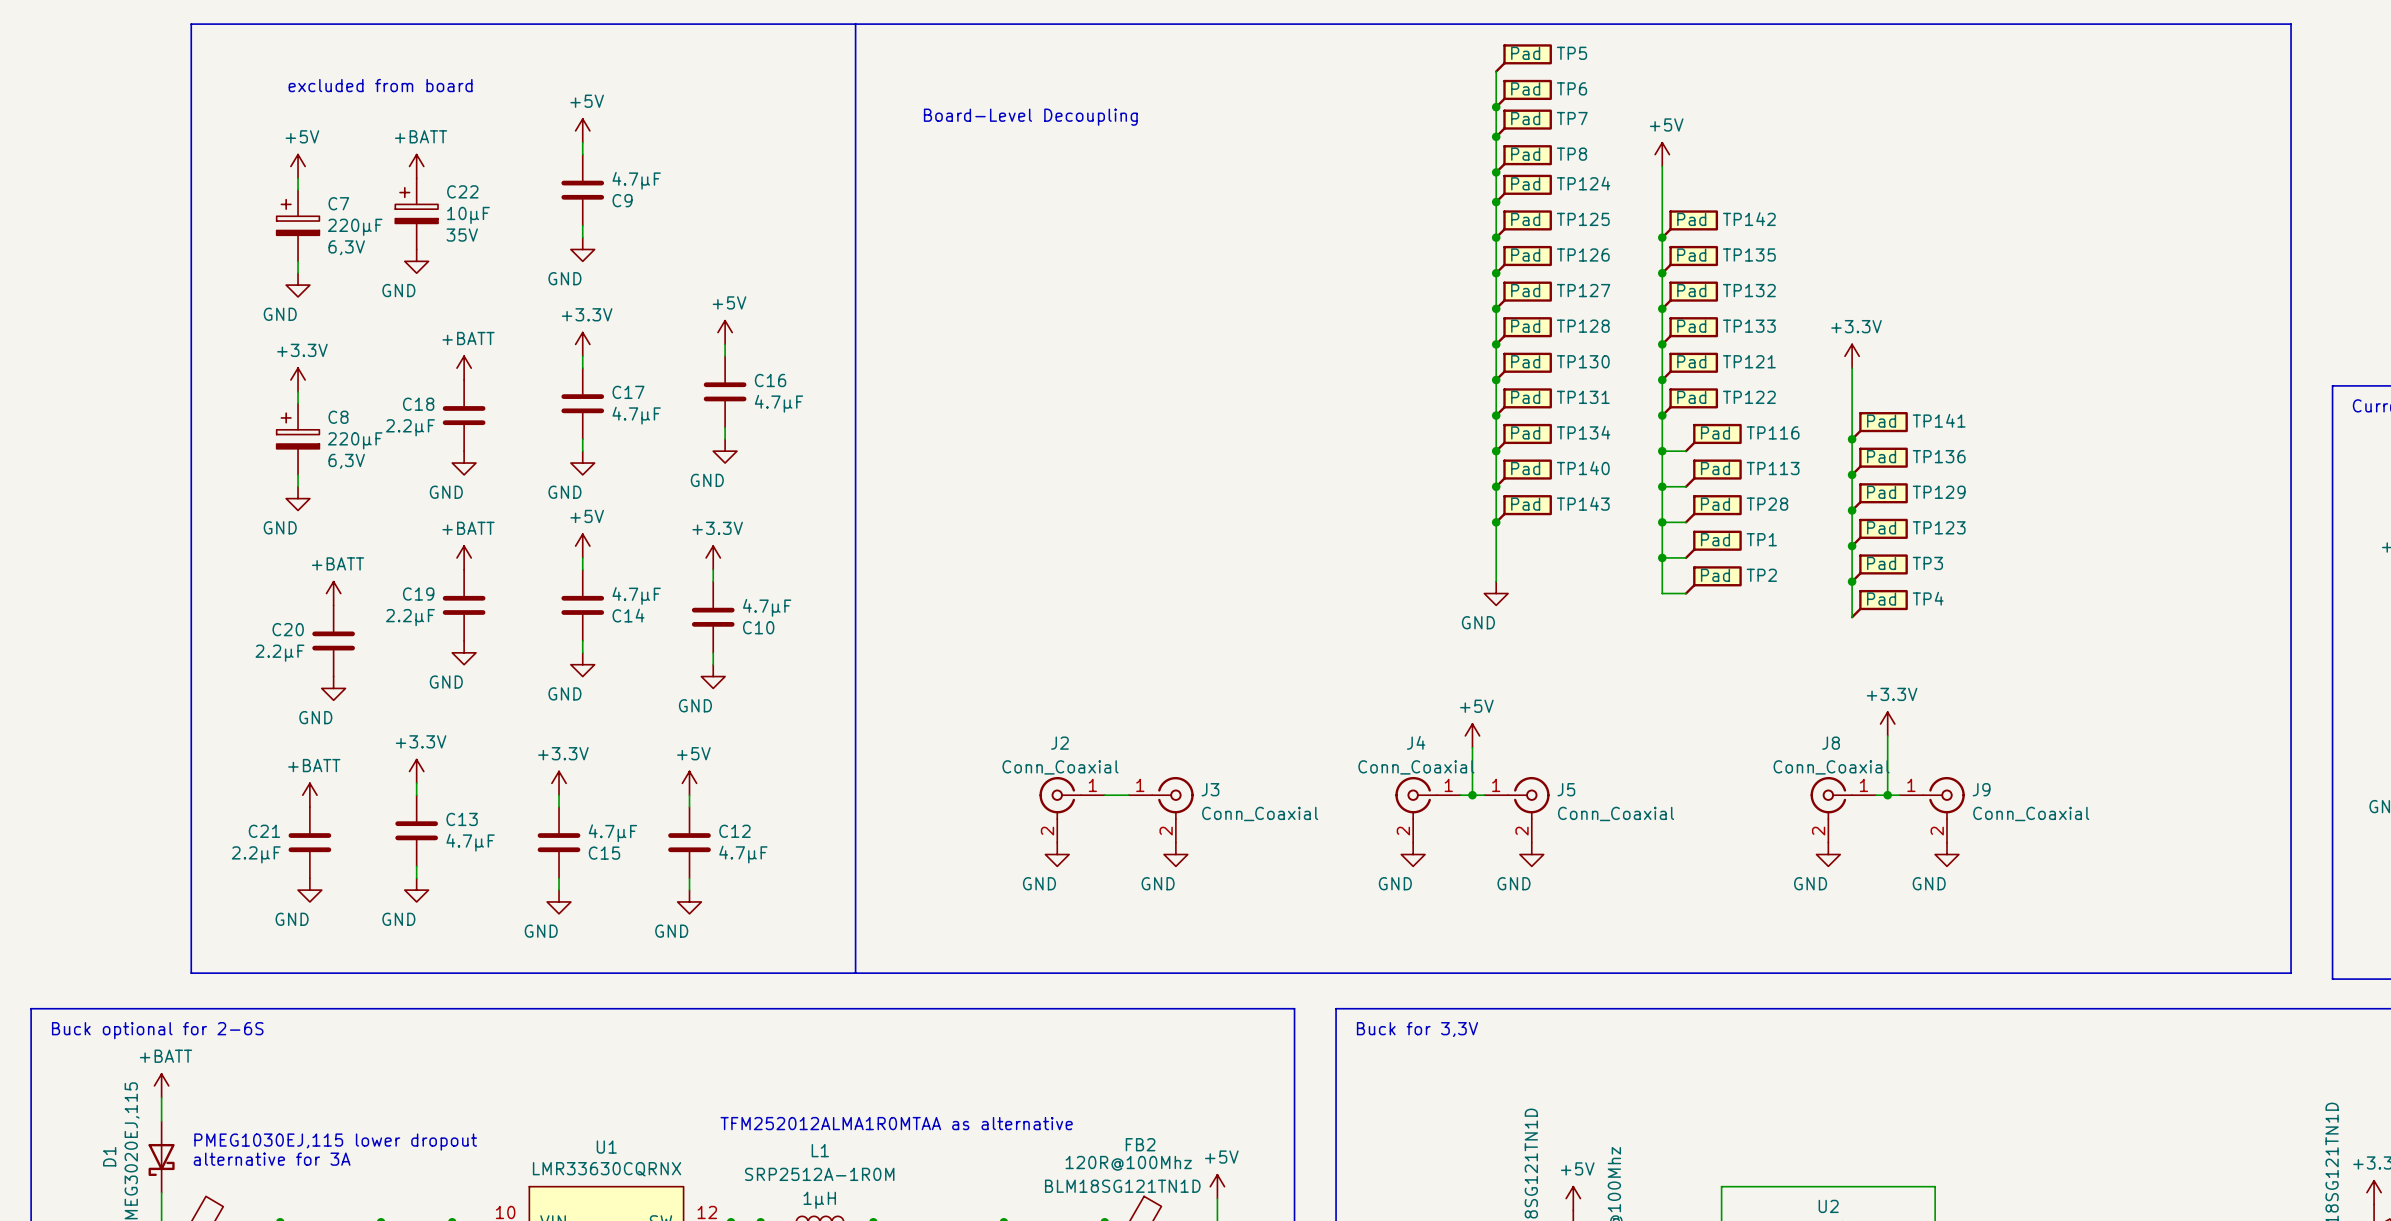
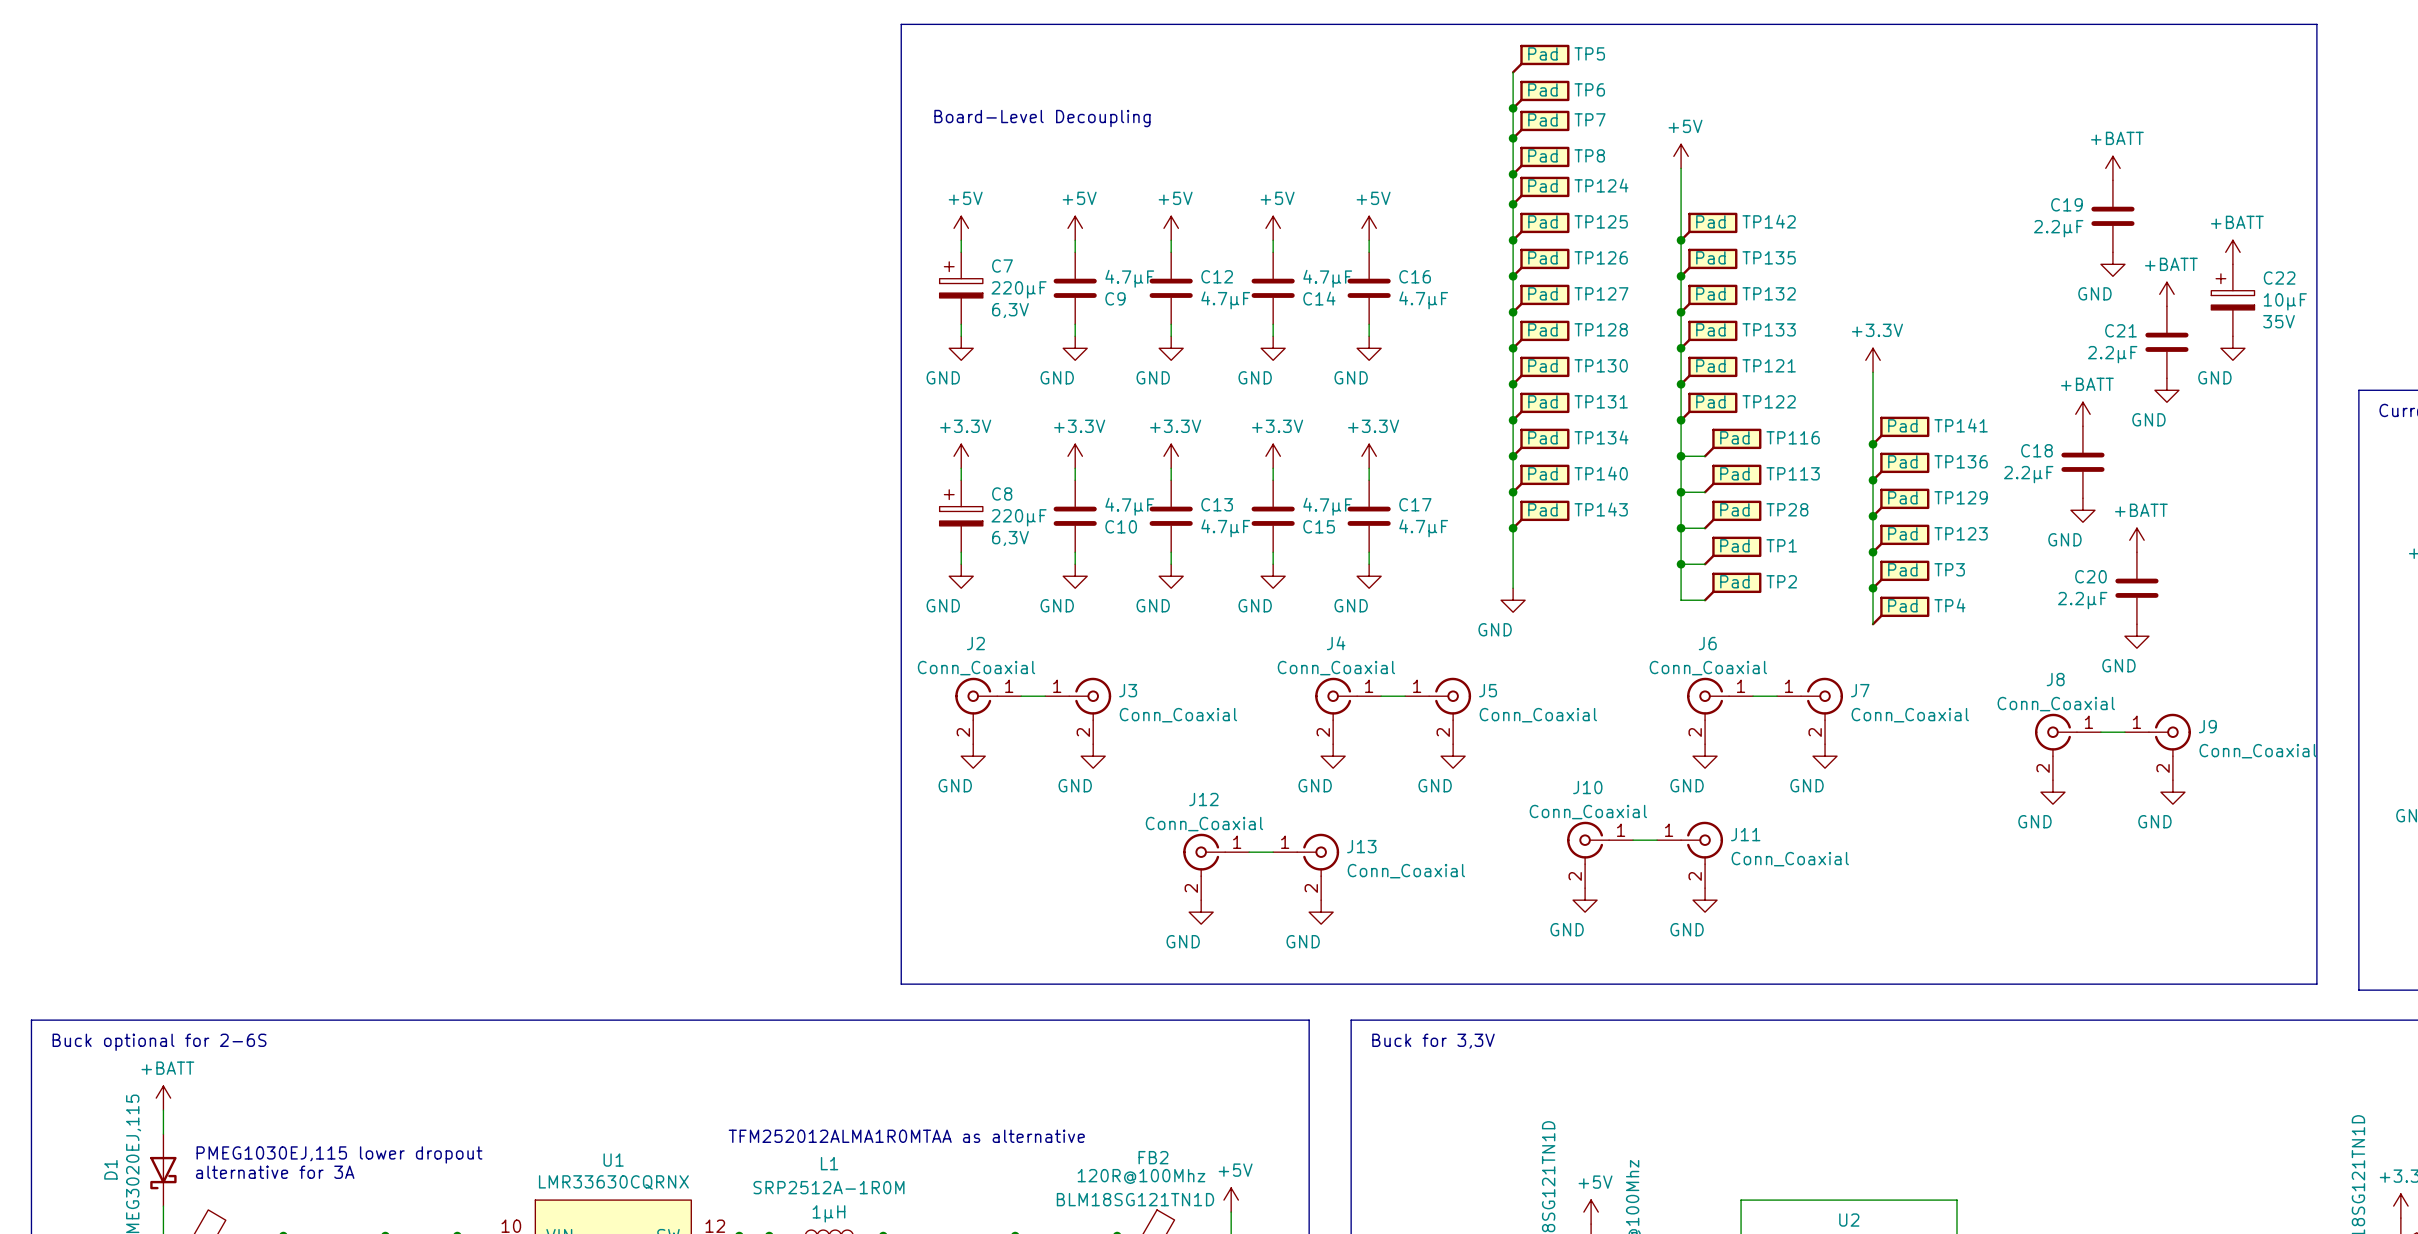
line: (855, 24) (855, 973) -> none
line: (891, 24) (191, 24) (191, 973) (891, 973) -> (901, 24) (901, 984)
text: excluded from board (380, 85) -> none
power symbol: +5V (582, 130) -> none
wire: (582, 142) (582, 154) -> none
power symbol: +5V (298, 166) -> none
power symbol: +BATT (416, 166) -> none
power symbol: none -> +BATT (2112, 168)
wire: (298, 178) (298, 190) -> none
C9 position: (582, 190) -> (1075, 288)
C22 position: (416, 213) -> (2232, 300)
C7 position: (298, 225) -> (961, 288)
wire: (582, 225) (582, 237) -> none
power symbol: none -> +5V (961, 228)
power symbol: none -> +5V (1075, 228)
power symbol: none -> +5V (1171, 228)
power symbol: none -> +5V (1273, 228)
power symbol: none -> +5V (1369, 228)
wire: none -> (961, 240) (961, 252)
wire: none -> (1075, 240) (1075, 252)
wire: none -> (1171, 240) (1171, 252)
wire: none -> (1273, 240) (1273, 252)
wire: none -> (1369, 240) (1369, 252)
power symbol: GND (582, 249) -> none
power symbol: none -> +BATT (2232, 252)
wire: (298, 261) (298, 273) -> none
power symbol: GND (416, 261) -> none
power symbol: none -> GND (2112, 264)
power symbol: GND (298, 285) -> none
power symbol: none -> +BATT (2166, 294)
wire: none -> (1075, 324) (1075, 336)
wire: none -> (1171, 324) (1171, 336)
wire: none -> (1273, 324) (1273, 336)
wire: none -> (1369, 324) (1369, 336)
power symbol: +5V (725, 332) -> none
power symbol: +3.3V (582, 344) -> none
wire: (725, 344) (725, 356) -> (961, 324) (961, 336)
power symbol: none -> GND (961, 348)
power symbol: none -> GND (1075, 348)
power symbol: none -> GND (1171, 348)
power symbol: none -> GND (1273, 348)
power symbol: none -> GND (1369, 348)
power symbol: none -> GND (2232, 348)
wire: (582, 356) (582, 368) -> none
power symbol: +BATT (464, 368) -> none
power symbol: +3.3V (298, 379) -> none
power symbol: none -> GND (2166, 390)
wire: (298, 391) (298, 403) -> none
C16 position: (725, 391) -> (1369, 288)
C17 position: (582, 403) -> (1369, 516)
power symbol: none -> +BATT (2082, 414)
C18 position: (464, 415) -> (2082, 462)
wire: (725, 427) (725, 439) -> (961, 468) (961, 480)
C8 position: (298, 439) -> (961, 516)
wire: (582, 439) (582, 451) -> none
power symbol: GND (725, 451) -> none
power symbol: none -> +3.3V (961, 456)
power symbol: none -> +3.3V (1075, 456)
power symbol: none -> +3.3V (1171, 456)
power symbol: none -> +3.3V (1273, 456)
power symbol: none -> +3.3V (1369, 456)
power symbol: GND (464, 463) -> none
power symbol: GND (582, 463) -> none
wire: none -> (1075, 468) (1075, 480)
wire: none -> (1171, 468) (1171, 480)
wire: none -> (1273, 468) (1273, 480)
wire: none -> (1369, 468) (1369, 480)
wire: (298, 474) (298, 486) -> none
power symbol: GND (298, 498) -> none
power symbol: none -> GND (2082, 510)
power symbol: none -> +BATT (2136, 540)
power symbol: +5V (582, 546) -> none
wire: none -> (961, 552) (961, 564)
wire: none -> (1075, 552) (1075, 564)
wire: none -> (1171, 552) (1171, 564)
wire: none -> (1273, 552) (1273, 564)
wire: none -> (1369, 552) (1369, 564)
power symbol: +BATT (464, 557) -> none
wire: (582, 557) (582, 569) -> none
power symbol: +3.3V (713, 557) -> none
wire: (713, 569) (713, 581) -> none
power symbol: none -> GND (961, 576)
power symbol: none -> GND (1075, 576)
power symbol: none -> GND (1171, 576)
power symbol: none -> GND (1273, 576)
power symbol: none -> GND (1369, 576)
power symbol: +BATT (333, 593) -> none
C19 position: (464, 605) -> (2112, 216)
C14 position: (582, 605) -> (1273, 288)
C10 position: (713, 617) -> (1075, 516)
power symbol: none -> GND (2136, 636)
C20 position: (333, 640) -> (2136, 588)
wire: (582, 640) (582, 652) -> none
power symbol: GND (464, 652) -> none
wire: (713, 652) (713, 664) -> none
power symbol: GND (582, 664) -> none
power symbol: GND (713, 676) -> none
power symbol: GND (333, 688) -> none
J6: none -> Conn_Coaxial (1720, 710)
J7: none -> Conn_Coaxial (1810, 710)
power symbol: +3.3V (1887, 724) -> none
wire: none -> (2100, 732) (2124, 732)
power symbol: +5V (1472, 735) -> none
wire: (1887, 735) (1887, 795) -> none
power symbol: none -> GND (973, 756)
power symbol: none -> GND (1093, 756)
power symbol: none -> GND (1333, 756)
power symbol: none -> GND (1453, 756)
wire: (1472, 747) (1472, 795) -> none
power symbol: none -> GND (1705, 756)
power symbol: none -> GND (1825, 756)
power symbol: +3.3V (416, 771) -> none
wire: (416, 783) (416, 795) -> none
power symbol: +3.3V (559, 783) -> none
power symbol: +5V (689, 783) -> none
power symbol: none -> GND (2052, 792)
power symbol: none -> GND (2172, 792)
power symbol: +BATT (309, 795) -> none
wire: (559, 795) (559, 807) -> none
wire: (689, 795) (689, 807) -> none
wire: (1104, 795) (1128, 795) -> (1021, 696) (1045, 696)
wire: (1460, 795) (1484, 795) -> (1381, 696) (1405, 696)
junction: (1472, 795) -> none
wire: (1875, 795) (1899, 795) -> (1753, 696) (1777, 696)
junction: (1887, 795) -> none
J2 position: (1072, 809) -> (988, 710)
J3 position: (1161, 809) -> (1078, 710)
J4 position: (1427, 809) -> (1348, 710)
J5 position: (1516, 809) -> (1438, 710)
J8 position: (1843, 809) -> (2067, 746)
J9 position: (1932, 809) -> (2157, 746)
C13 position: (416, 830) -> (1171, 516)
wire: none -> (1633, 840) (1657, 840)
C21 position: (309, 842) -> (2166, 342)
C15 position: (559, 842) -> (1273, 516)
C12 position: (689, 842) -> (1171, 288)
wire: none -> (1249, 852) (1273, 852)
J10: none -> Conn_Coaxial (1600, 854)
J11: none -> Conn_Coaxial (1690, 854)
power symbol: GND (1057, 854) -> none
power symbol position: GND (1175, 854) -> GND (1201, 912)
power symbol: GND (1413, 854) -> none
power symbol position: GND (1531, 854) -> GND (1585, 900)
power symbol: GND (1828, 854) -> none
power symbol: GND (1947, 854) -> none
J12: none -> Conn_Coaxial (1216, 866)
J13: none -> Conn_Coaxial (1306, 866)
wire: (416, 866) (416, 878) -> none
wire: (559, 878) (559, 890) -> none
wire: (689, 878) (689, 890) -> none
power symbol: GND (309, 890) -> none
power symbol: GND (416, 890) -> none
power symbol: none -> GND (1705, 900)
power symbol: GND (559, 901) -> none
power symbol: GND (689, 901) -> none
power symbol: none -> GND (1321, 912)

